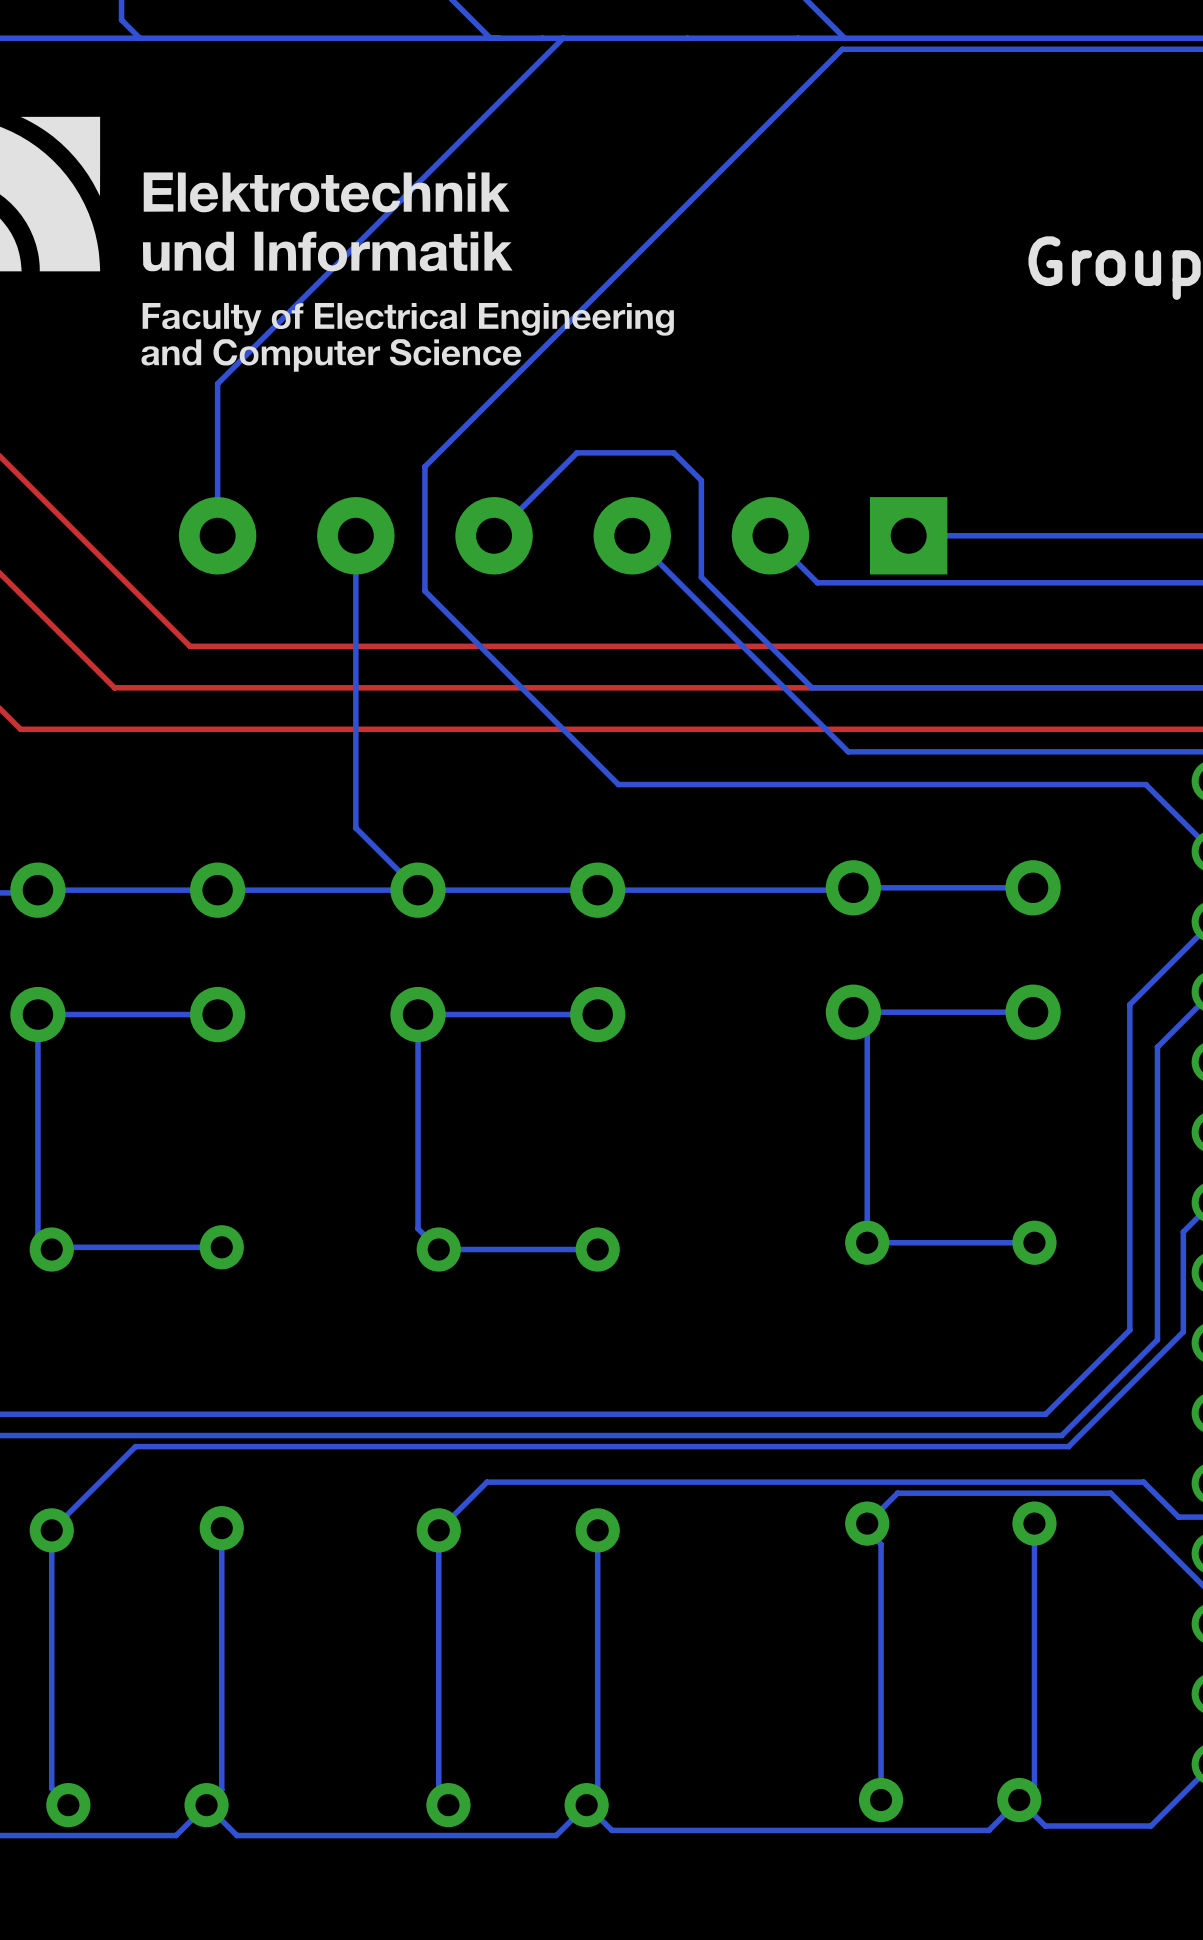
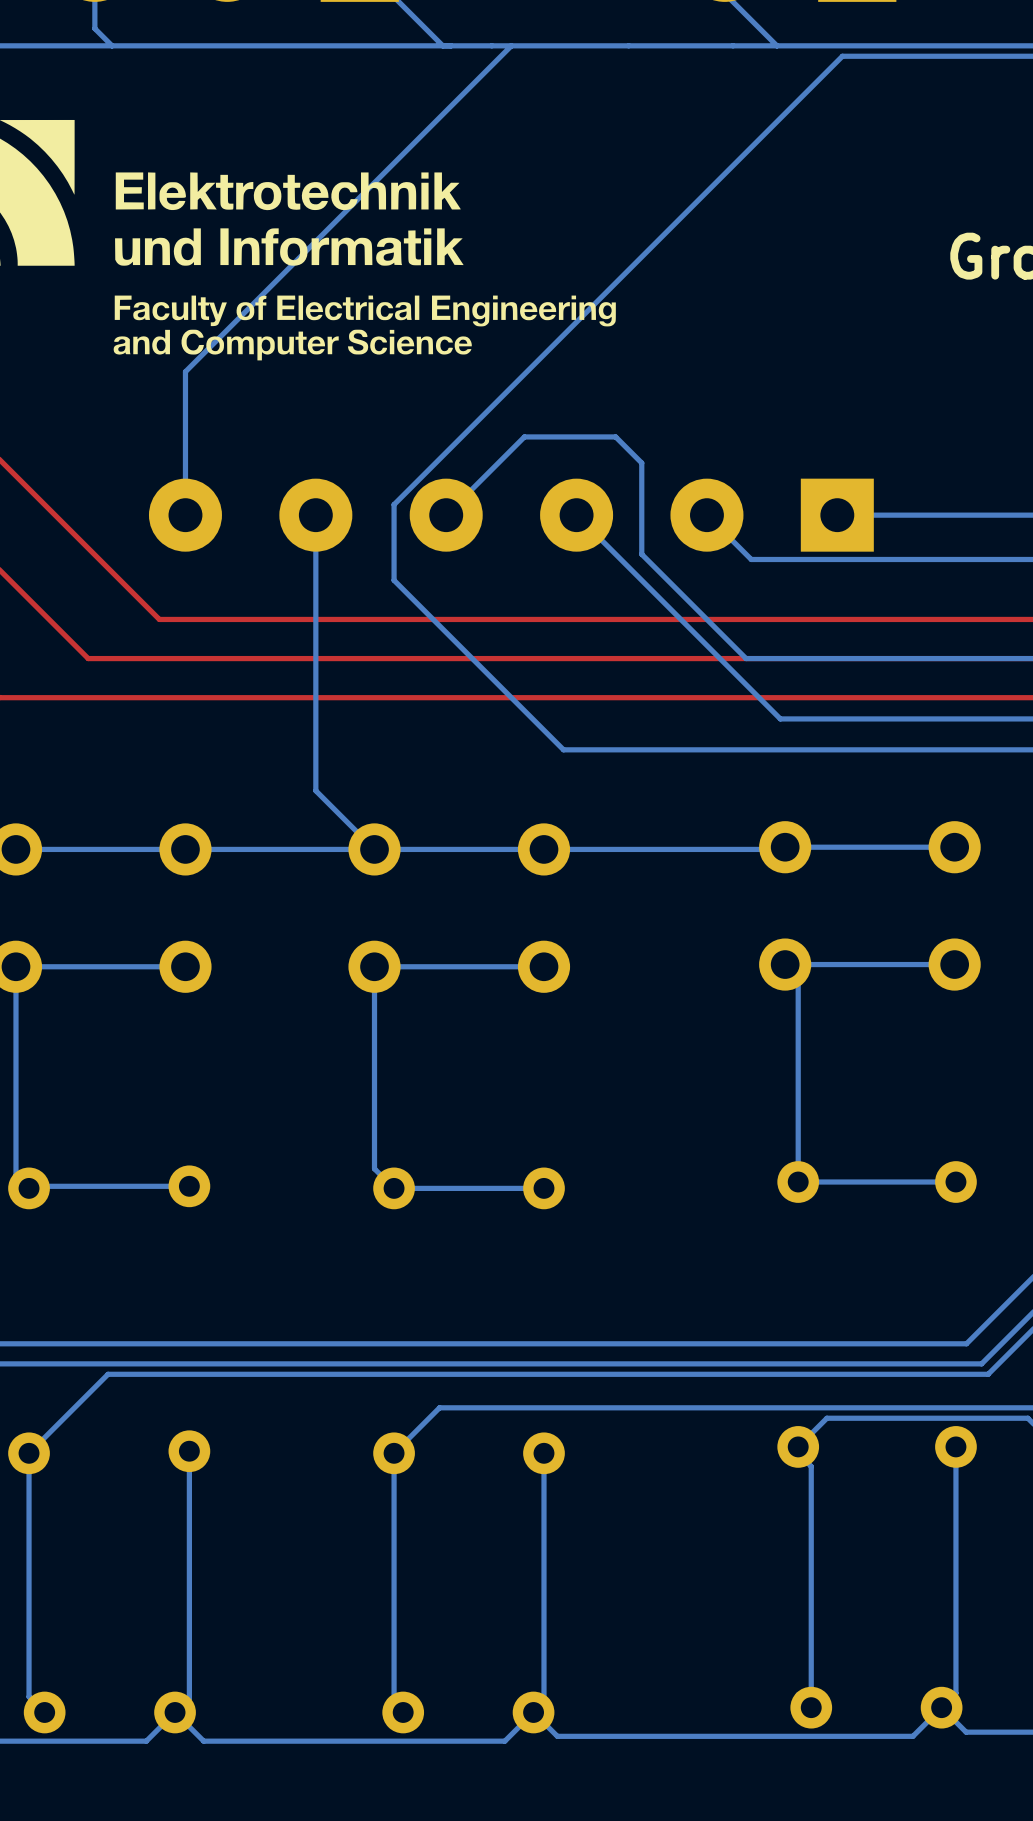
bottom track: (914, 49) (842, 49) (424, 466) (424, 591) (438, 604) -> (842, 56) (394, 504) (394, 580)

